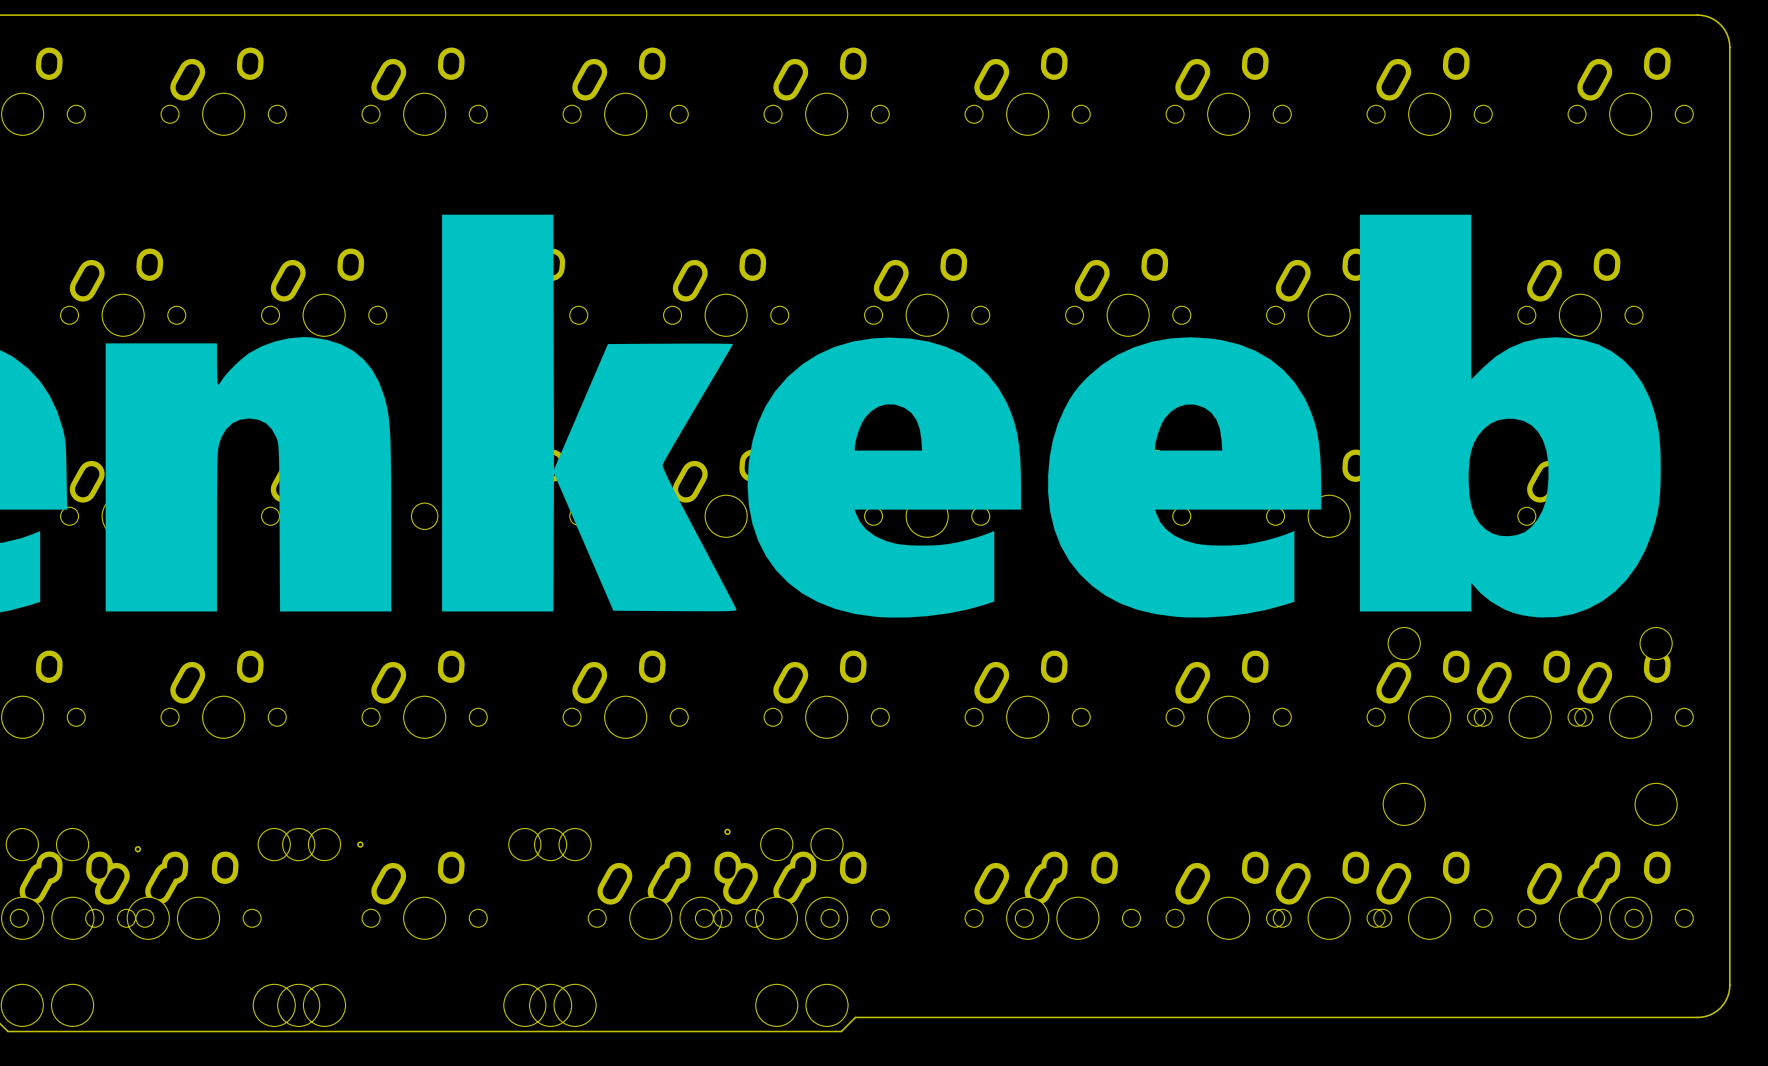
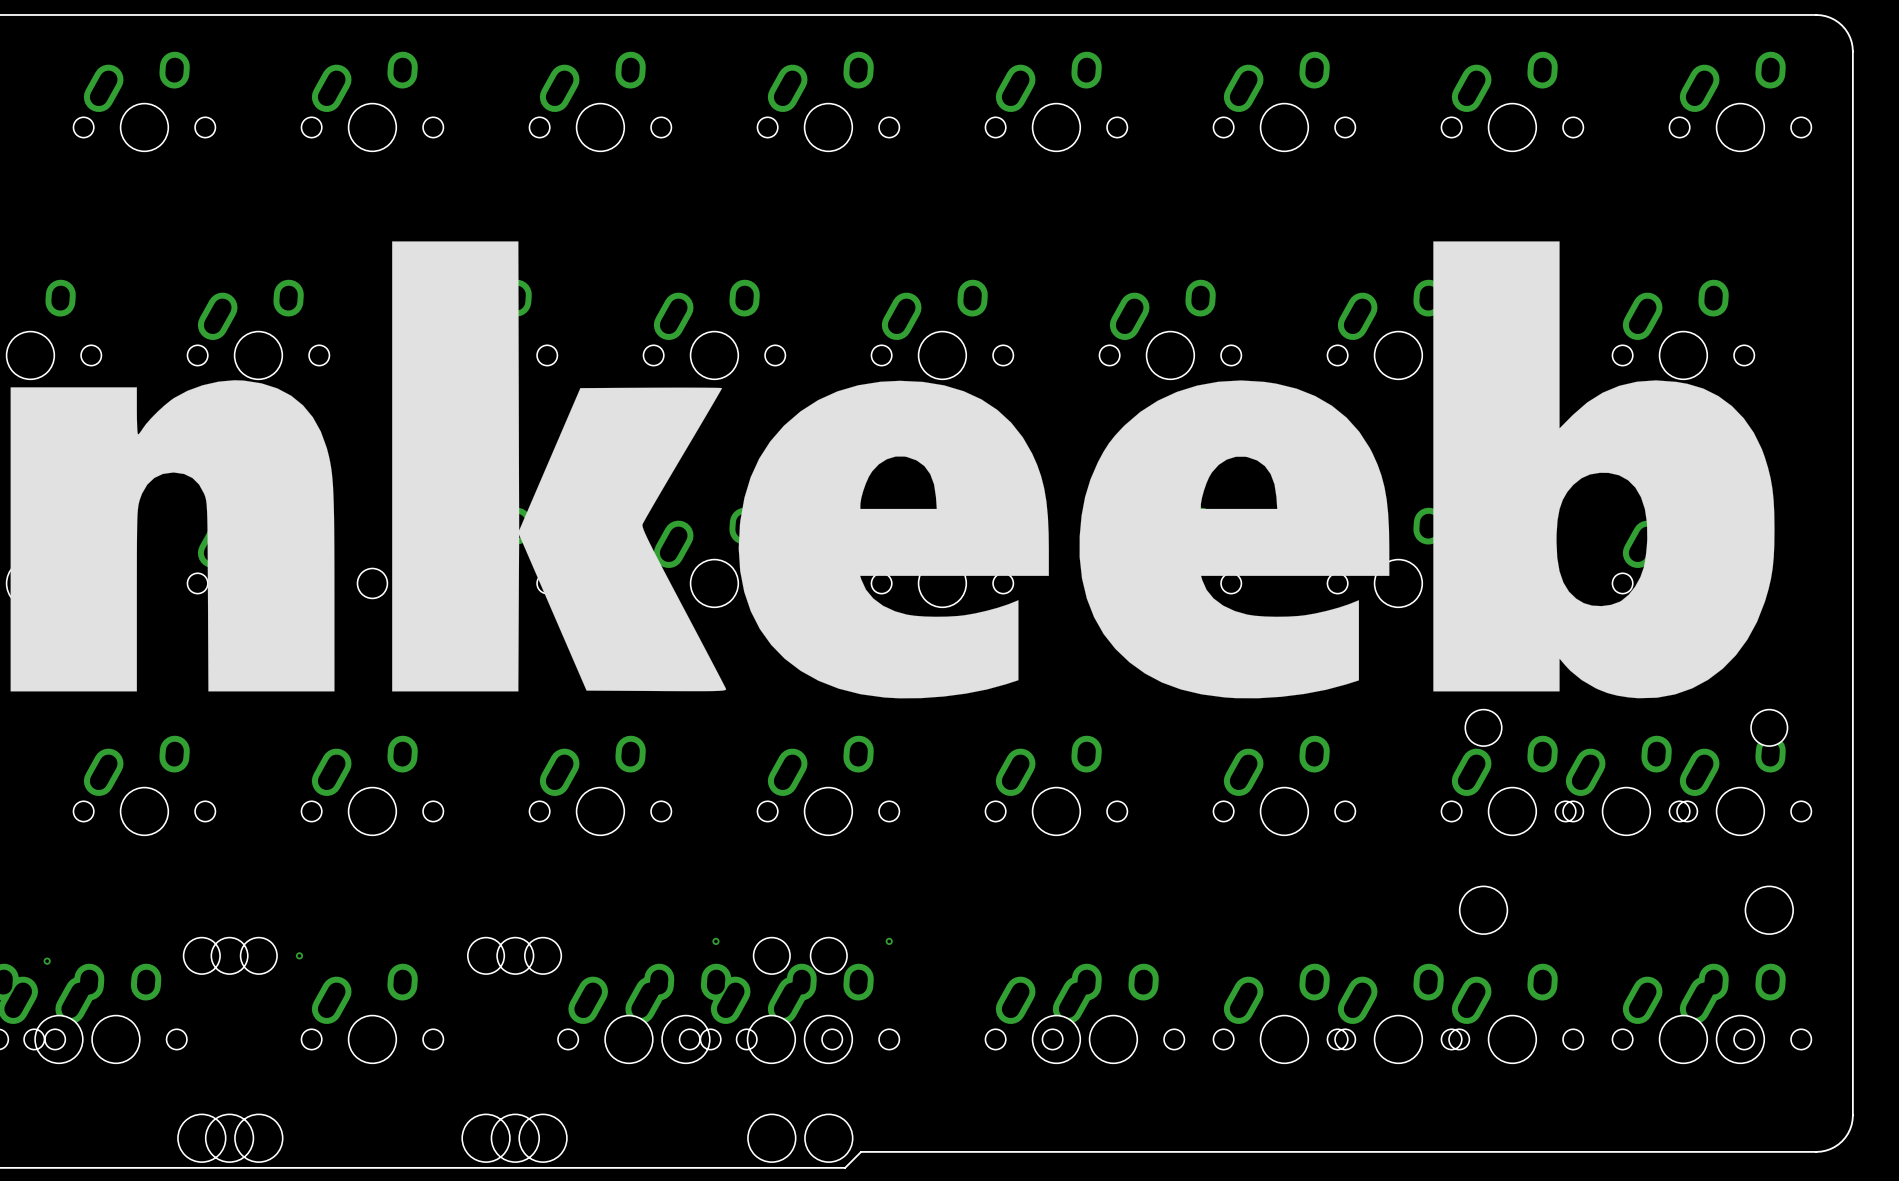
part: none -> (889, 941)

